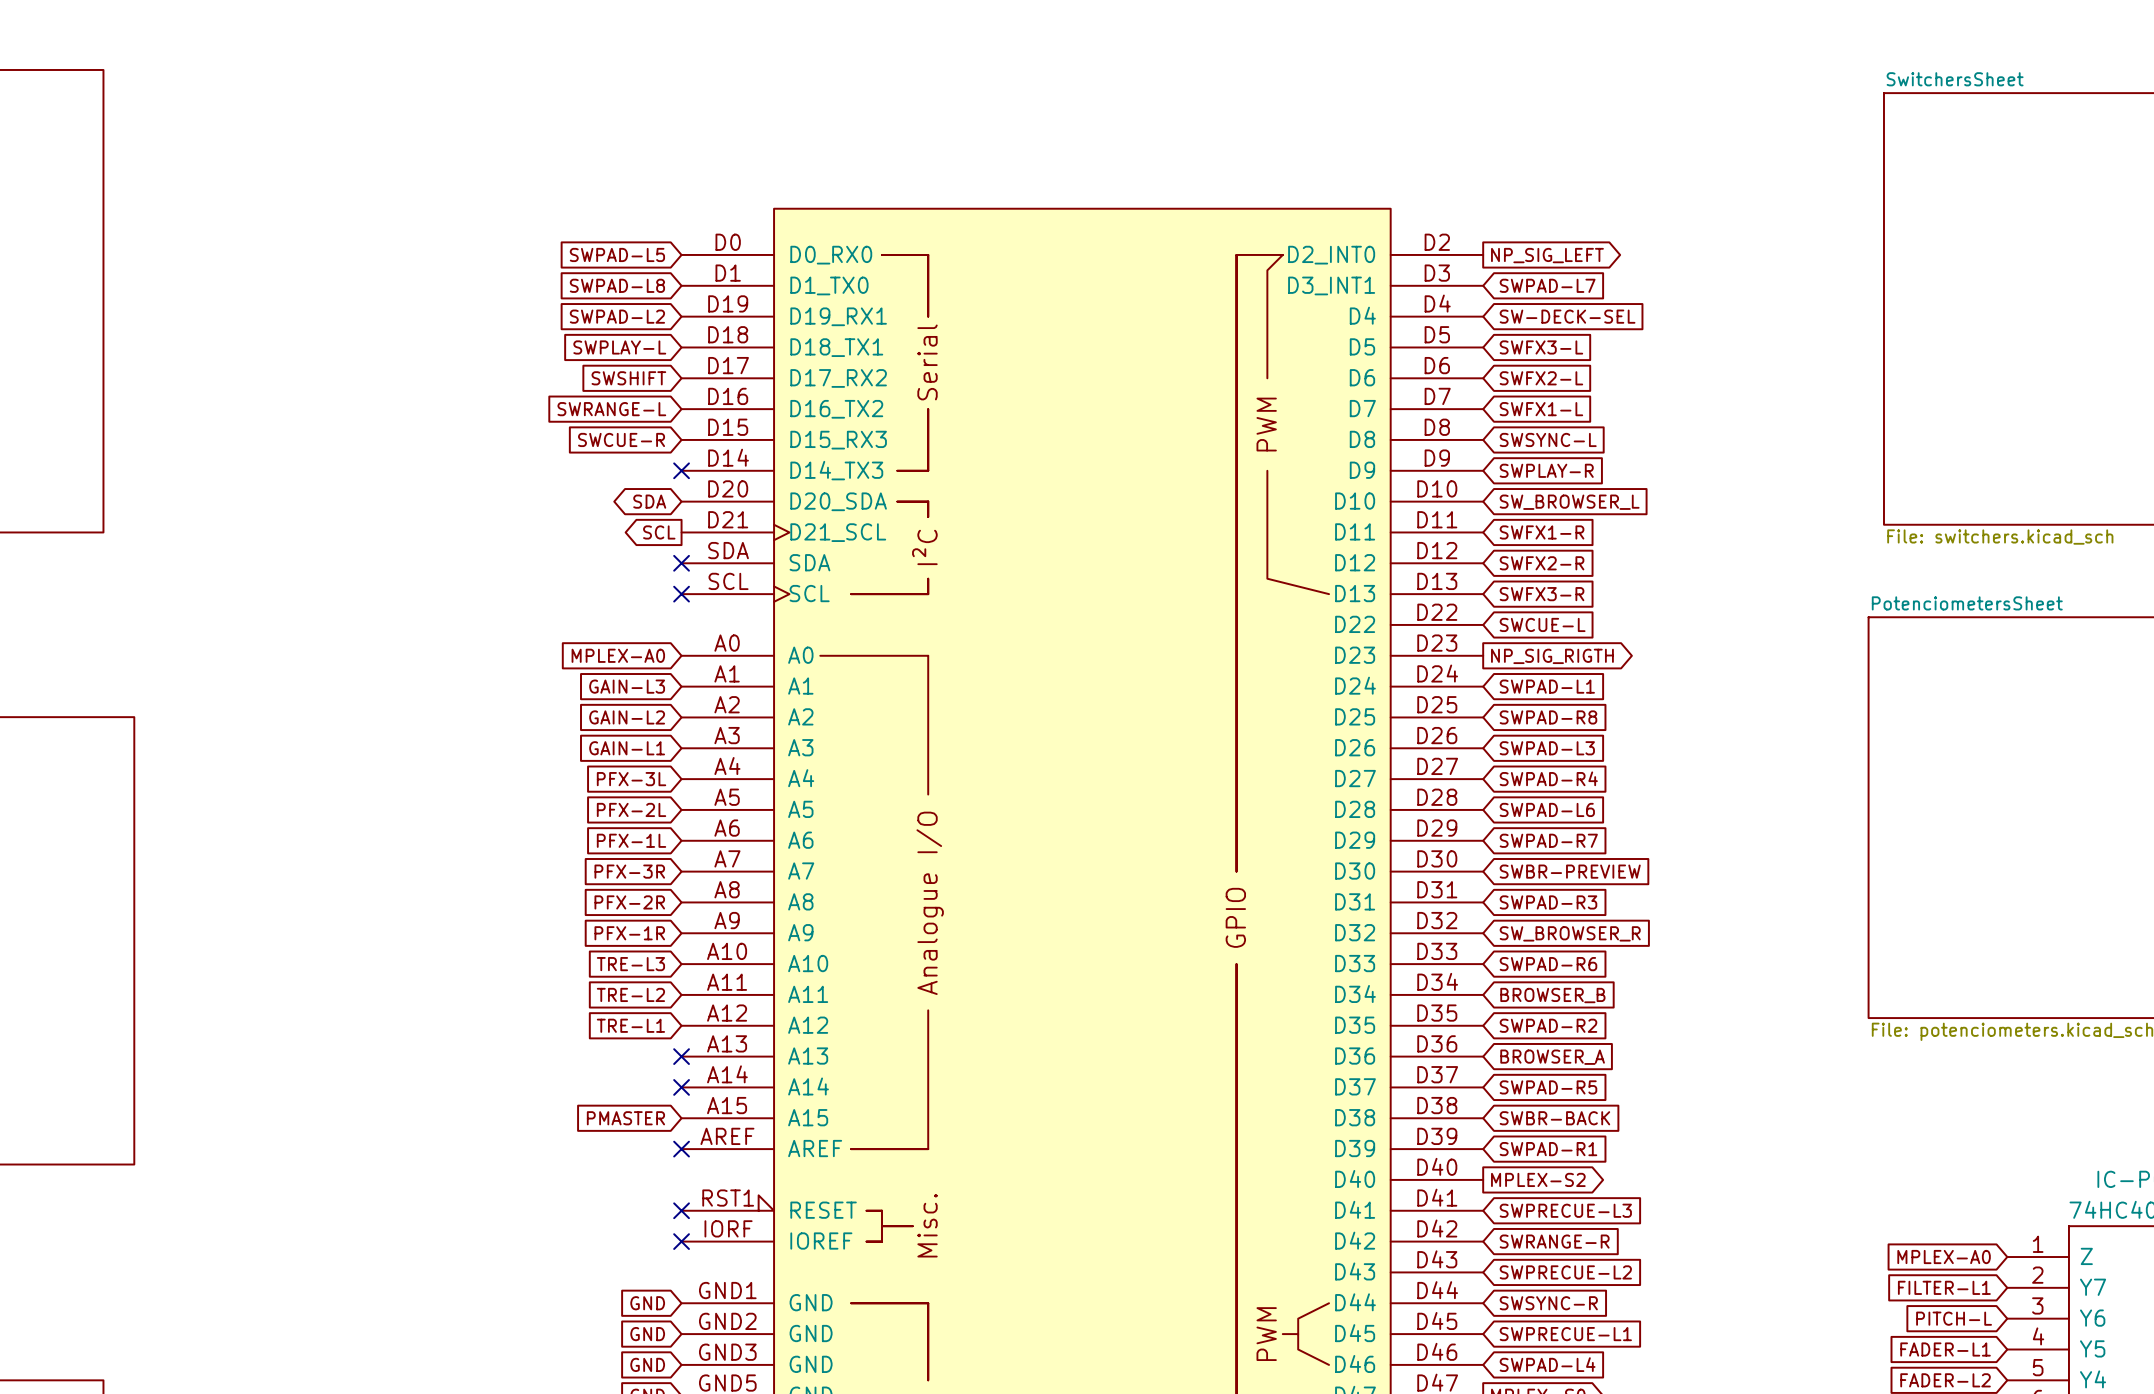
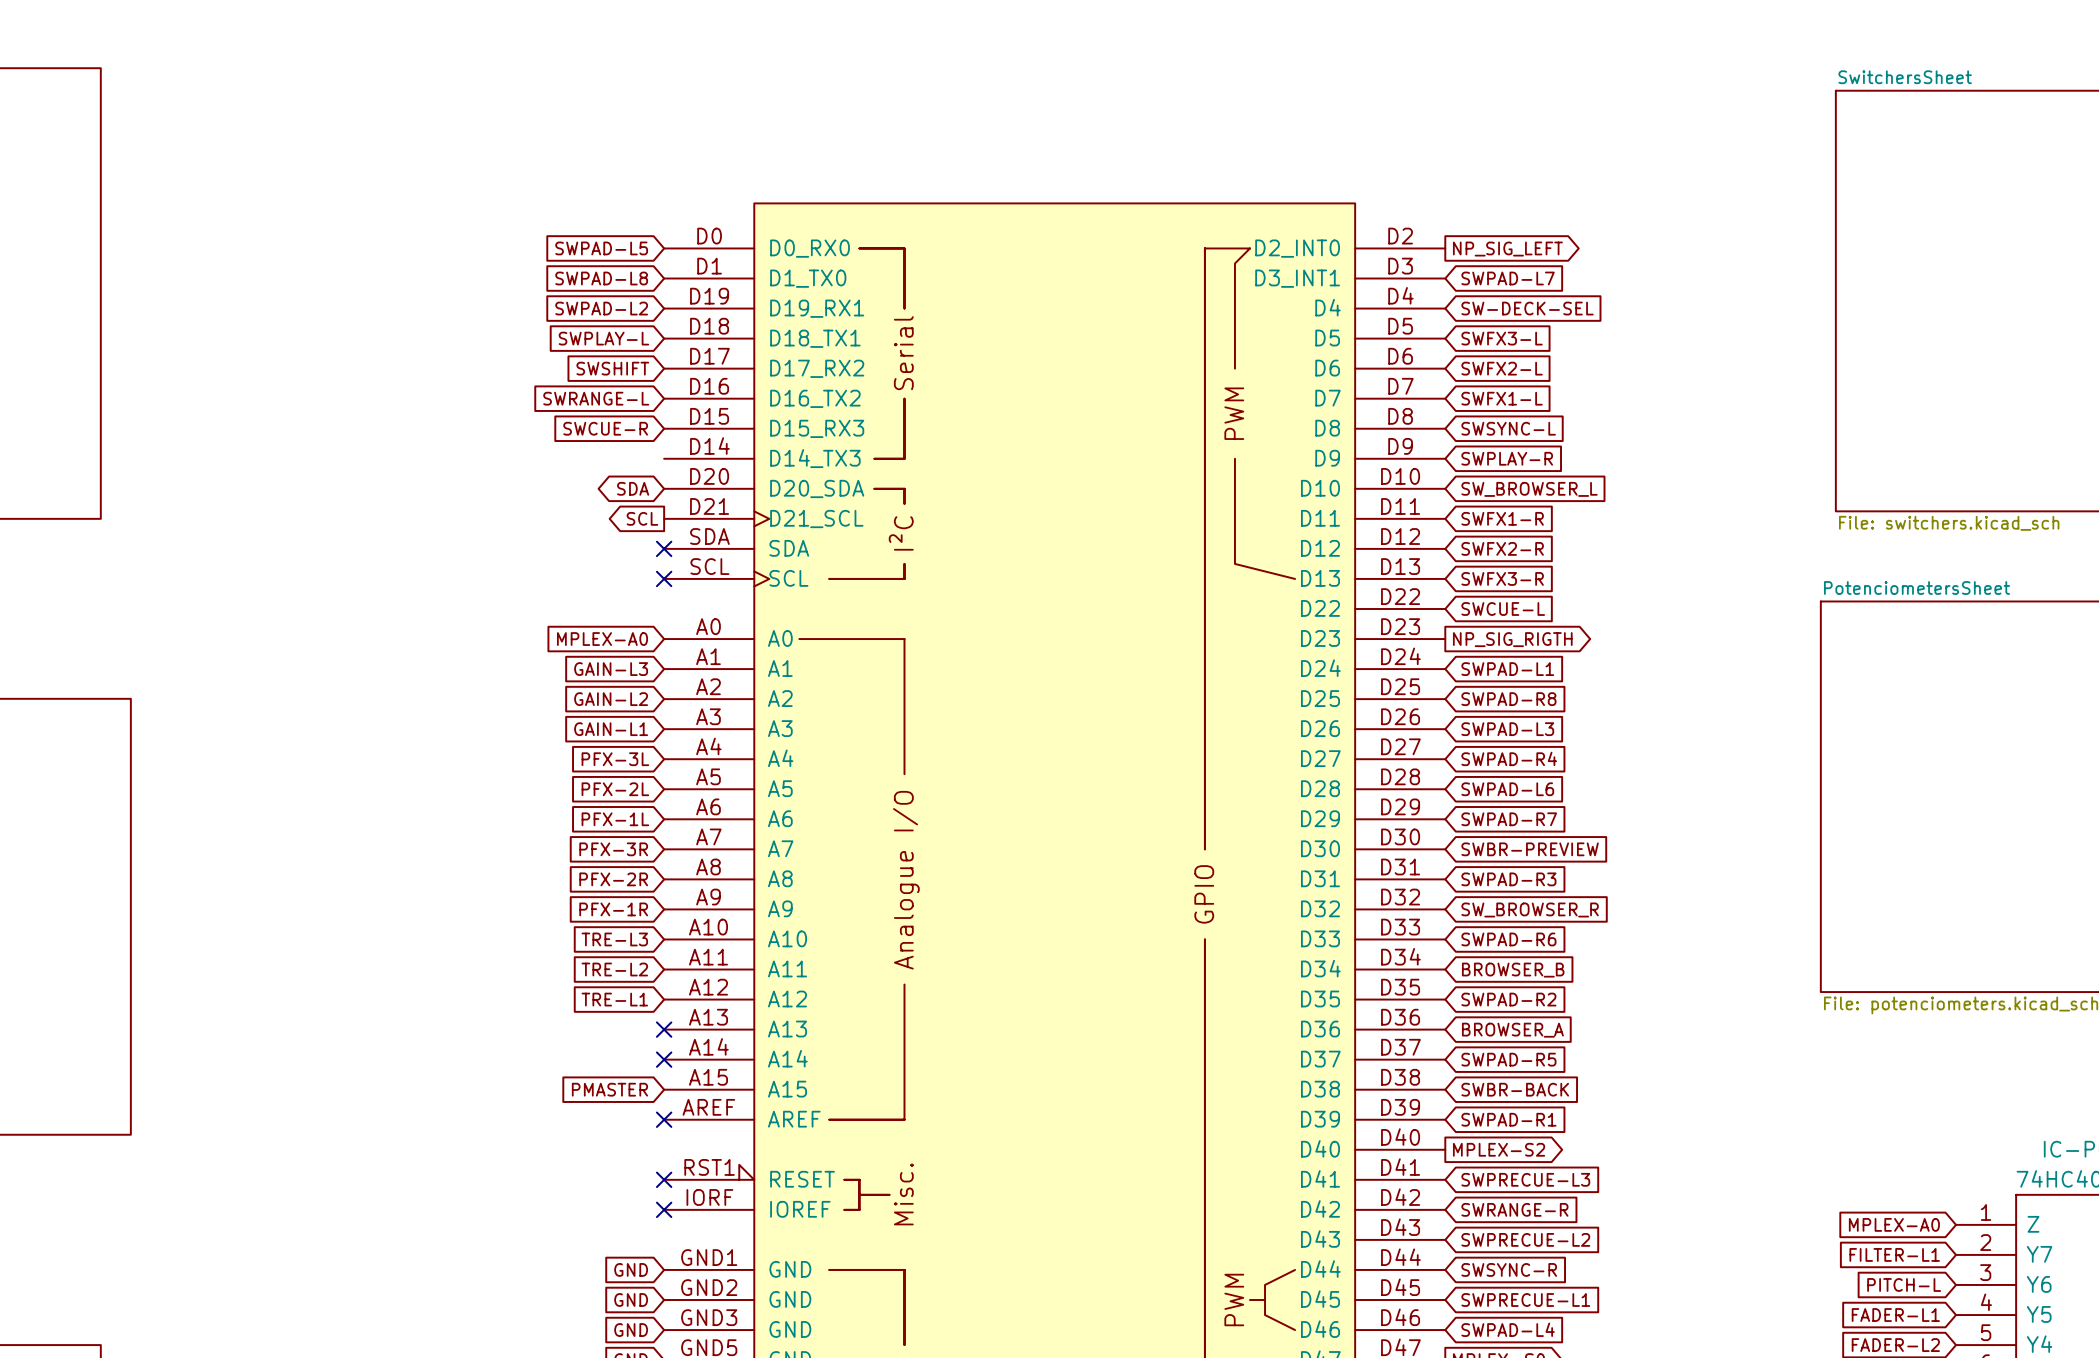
no-connect mark: (681, 470) -> none

